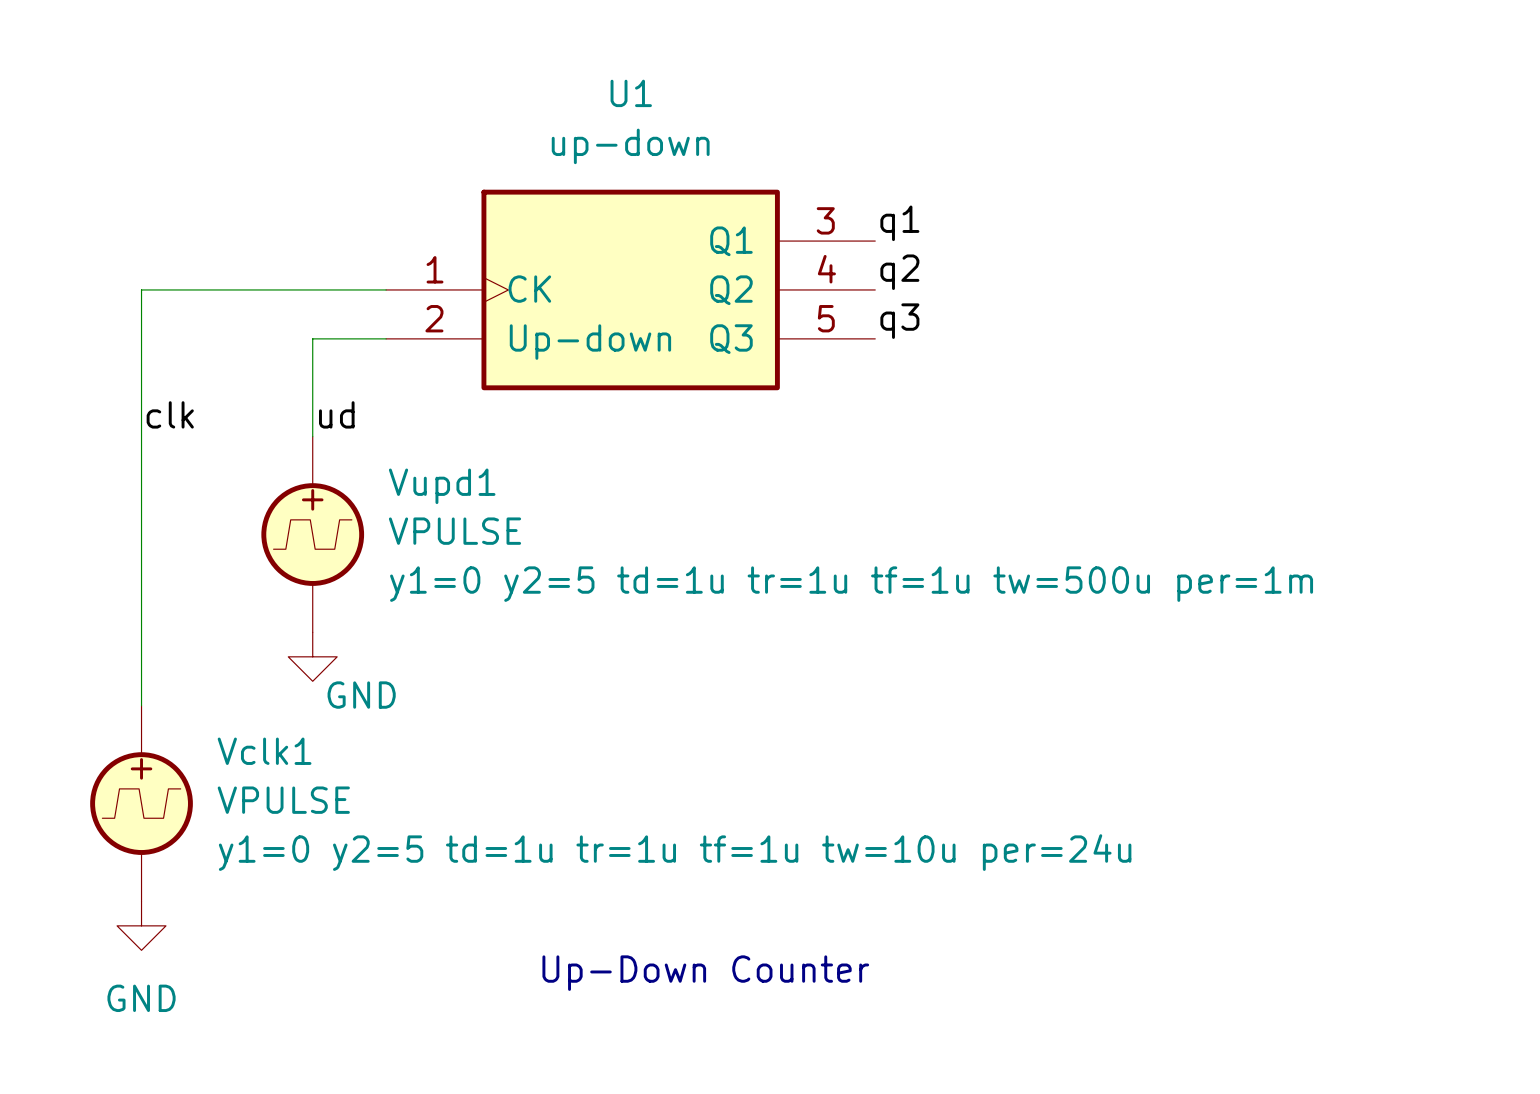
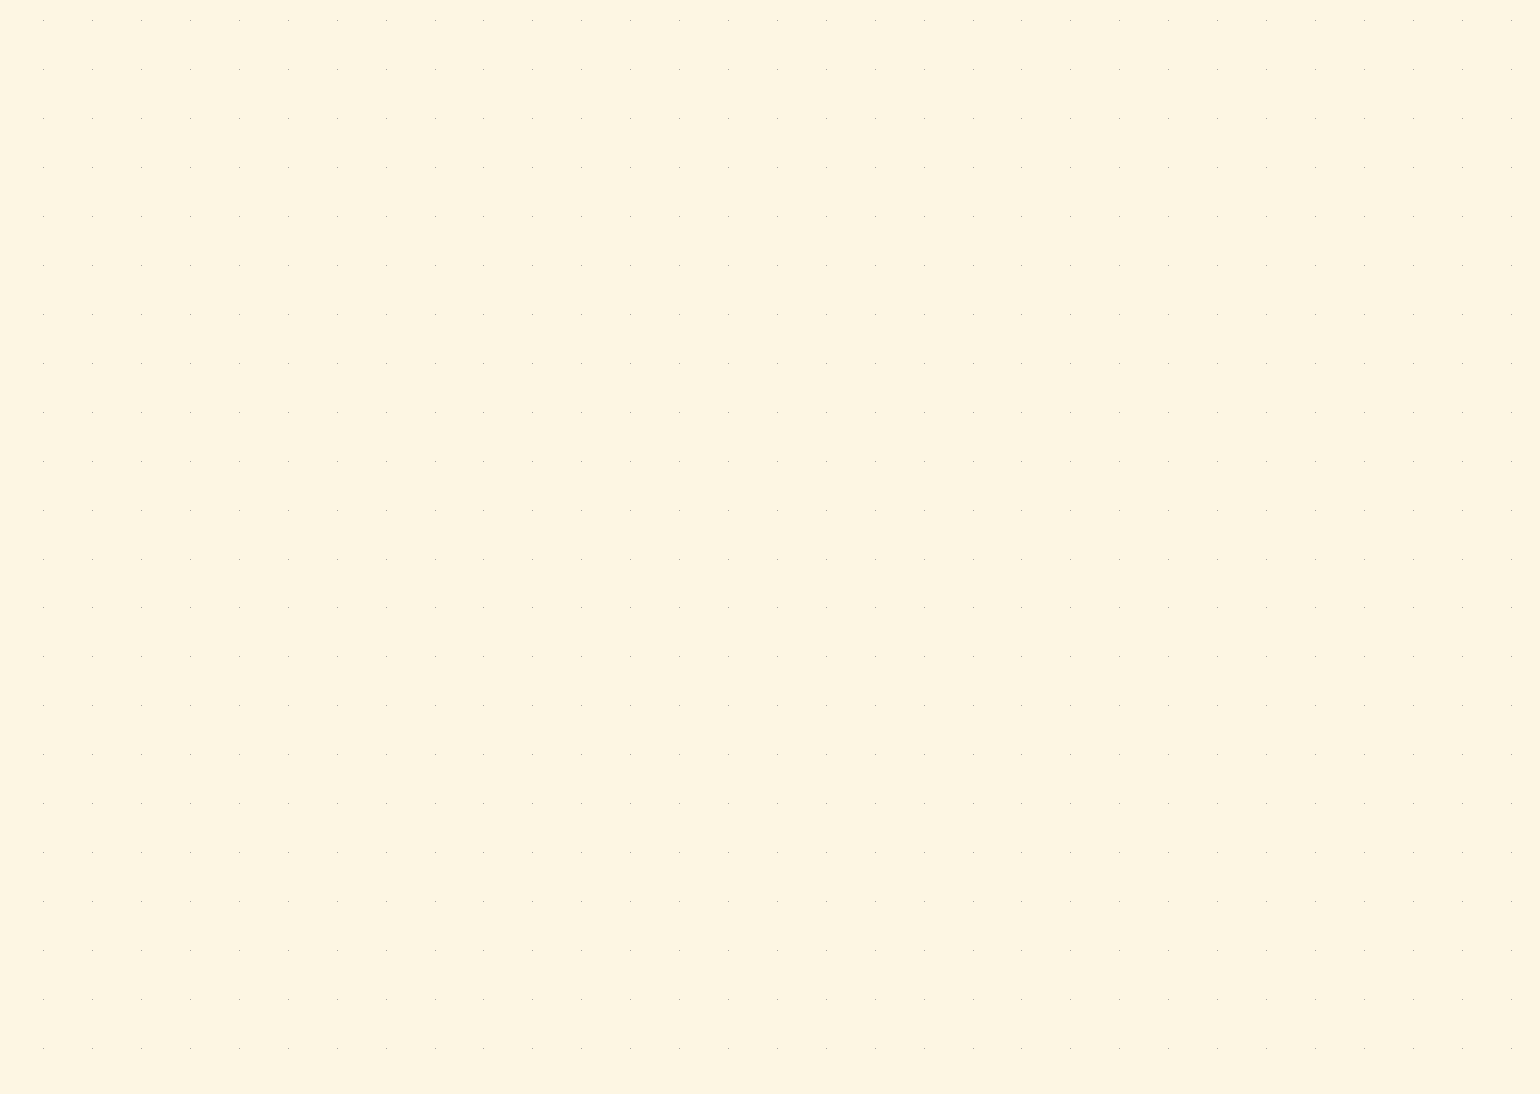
label: q1 (899, 223) -> none
label: q2 (899, 272) -> none
wire: (386, 289) (141, 289) (141, 705) -> none
U1: up-down (630, 289) -> none
label: q3 (899, 321) -> none
wire: (386, 338) (312, 338) (312, 436) -> none
label: clk (170, 414) -> none
label: ud (336, 414) -> none
Vupd1: VPULSE (312, 534) -> none
power symbol: GND (312, 656) -> none
Vclk1: VPULSE (141, 803) -> none
power symbol: GND (141, 925) -> none
text: Up-Down Counter (705, 973) -> none

